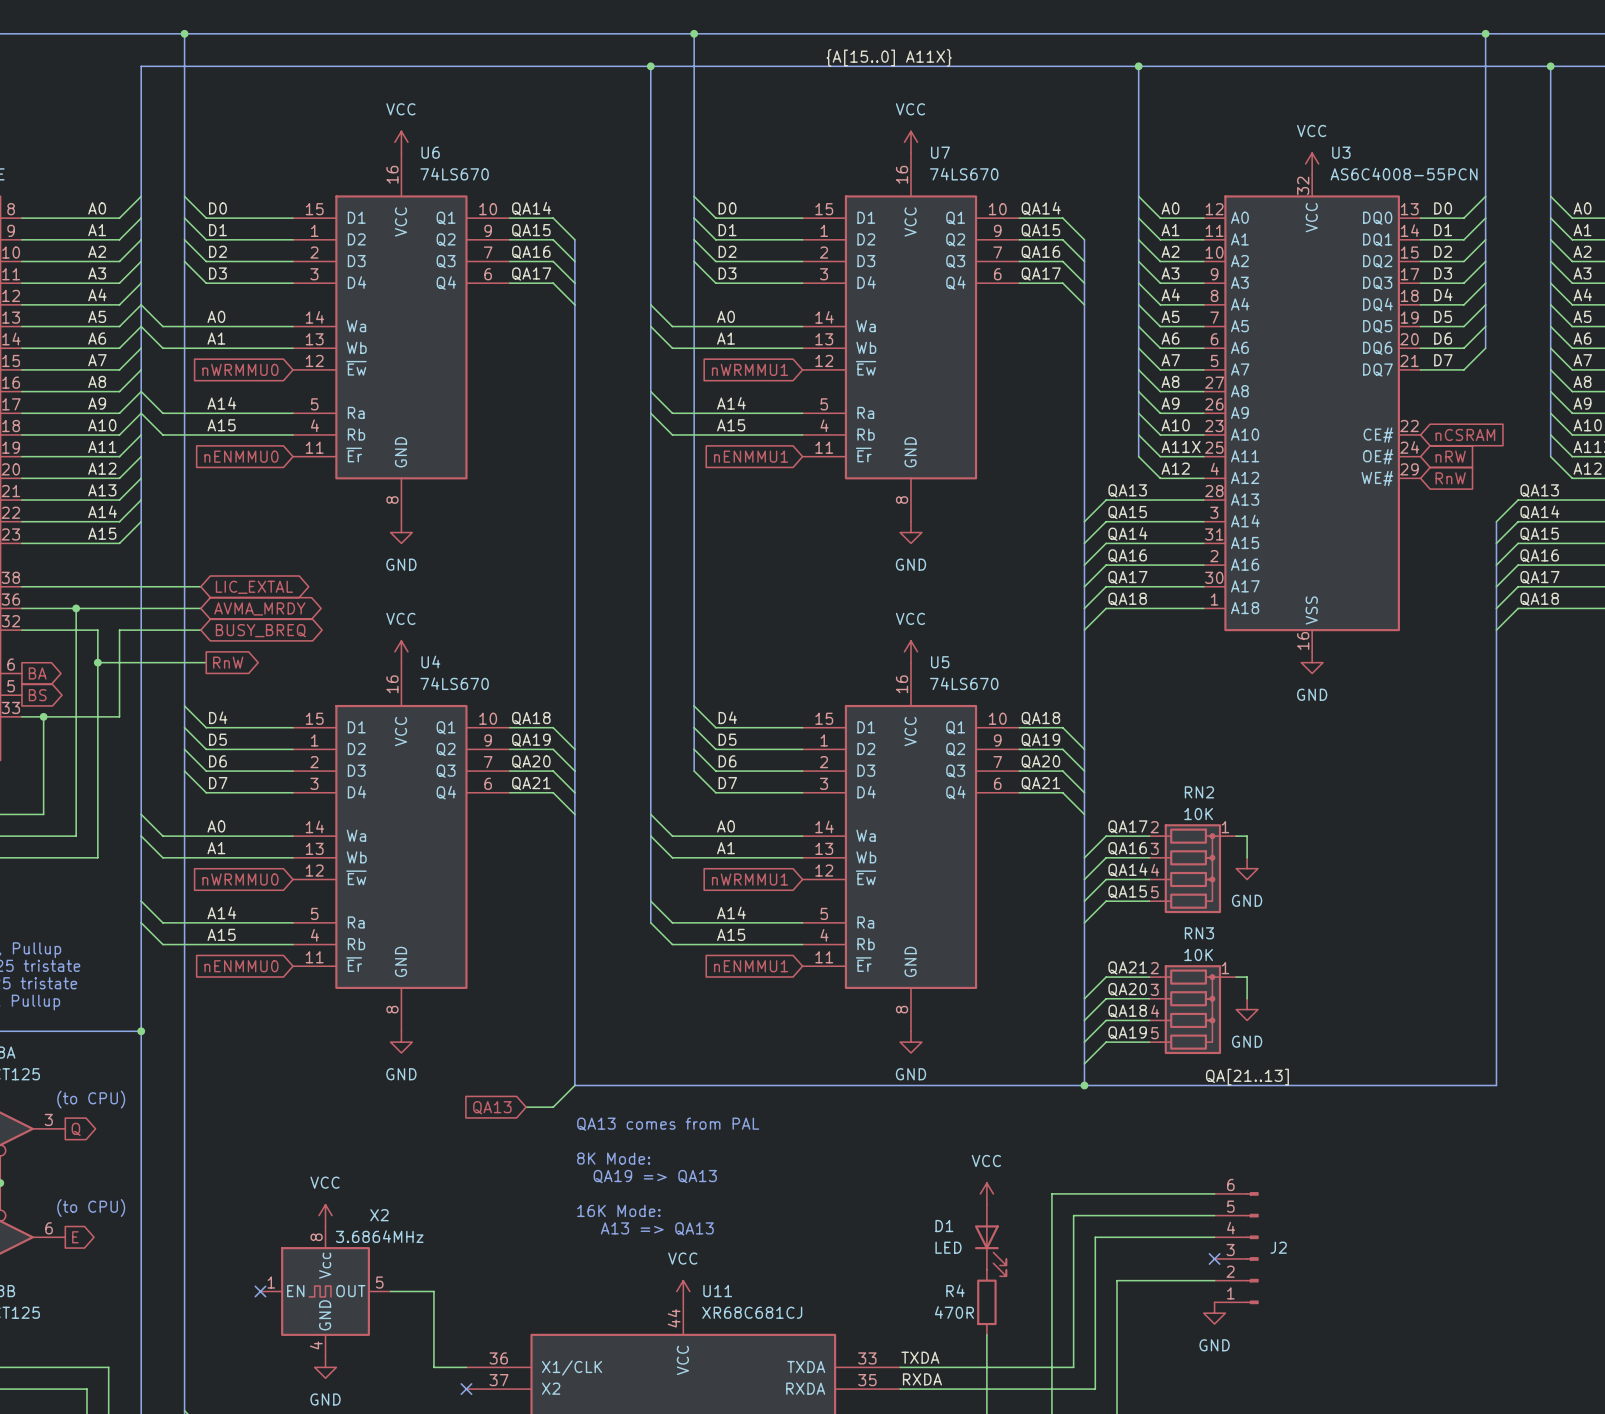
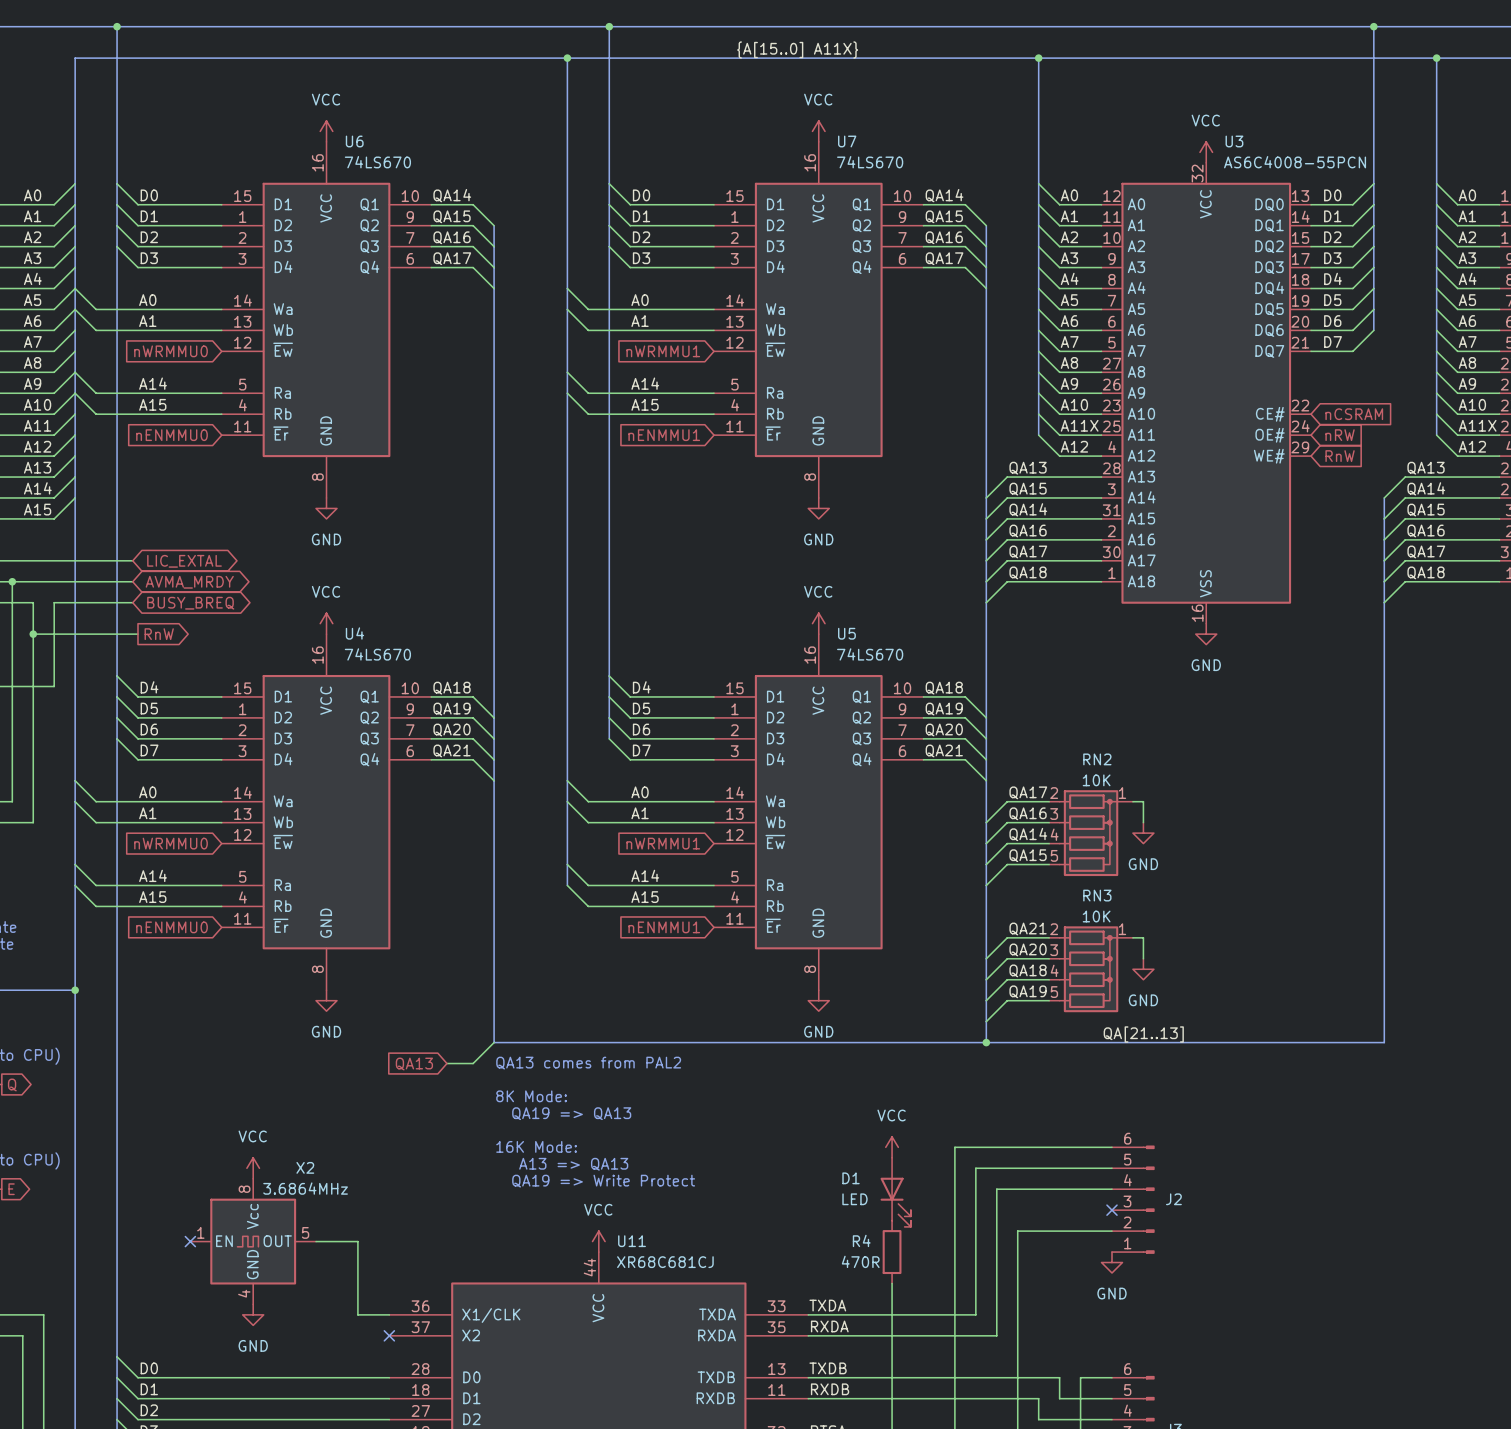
text: QA13 comes from PAL (668, 1124) -> QA13 comes from PAL2 (588, 1063)
text: none -> 8K Mode: (531, 1096)
text: 8K Mode: (613, 1158) -> QA19 => QA13 (571, 1113)
text: QA19 => QA13 (655, 1176) -> none
text: none -> 16K Mode: (536, 1146)
text: 16K Mode: (618, 1210) -> A13 => QA13 (573, 1164)
text: A13 => QA13 (657, 1228) -> QA19 => Write Protect (603, 1181)

